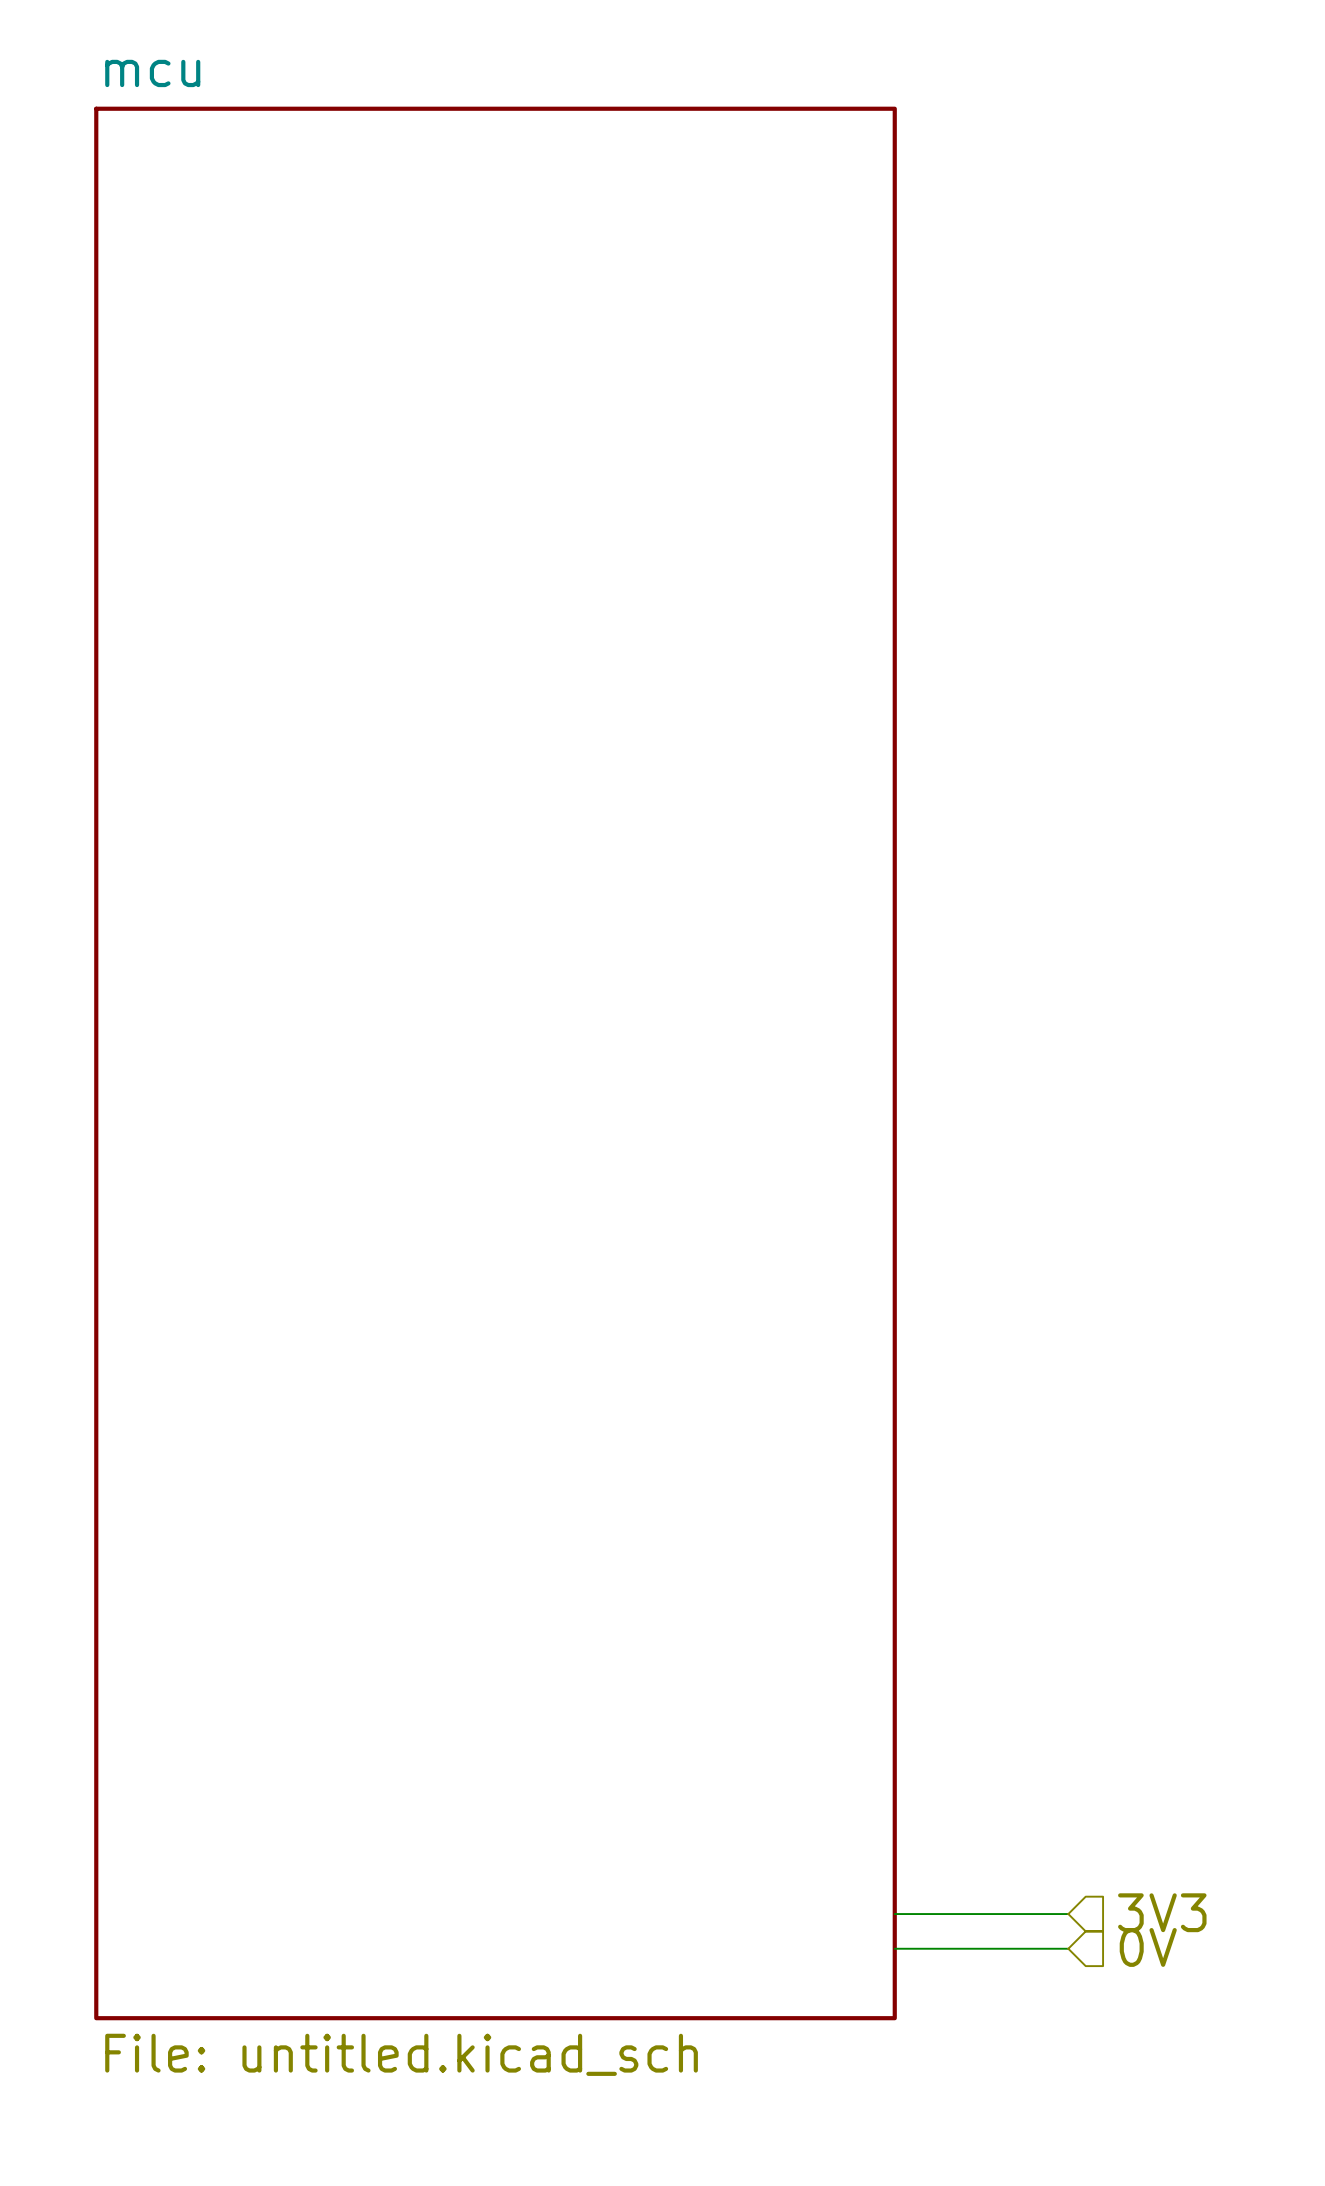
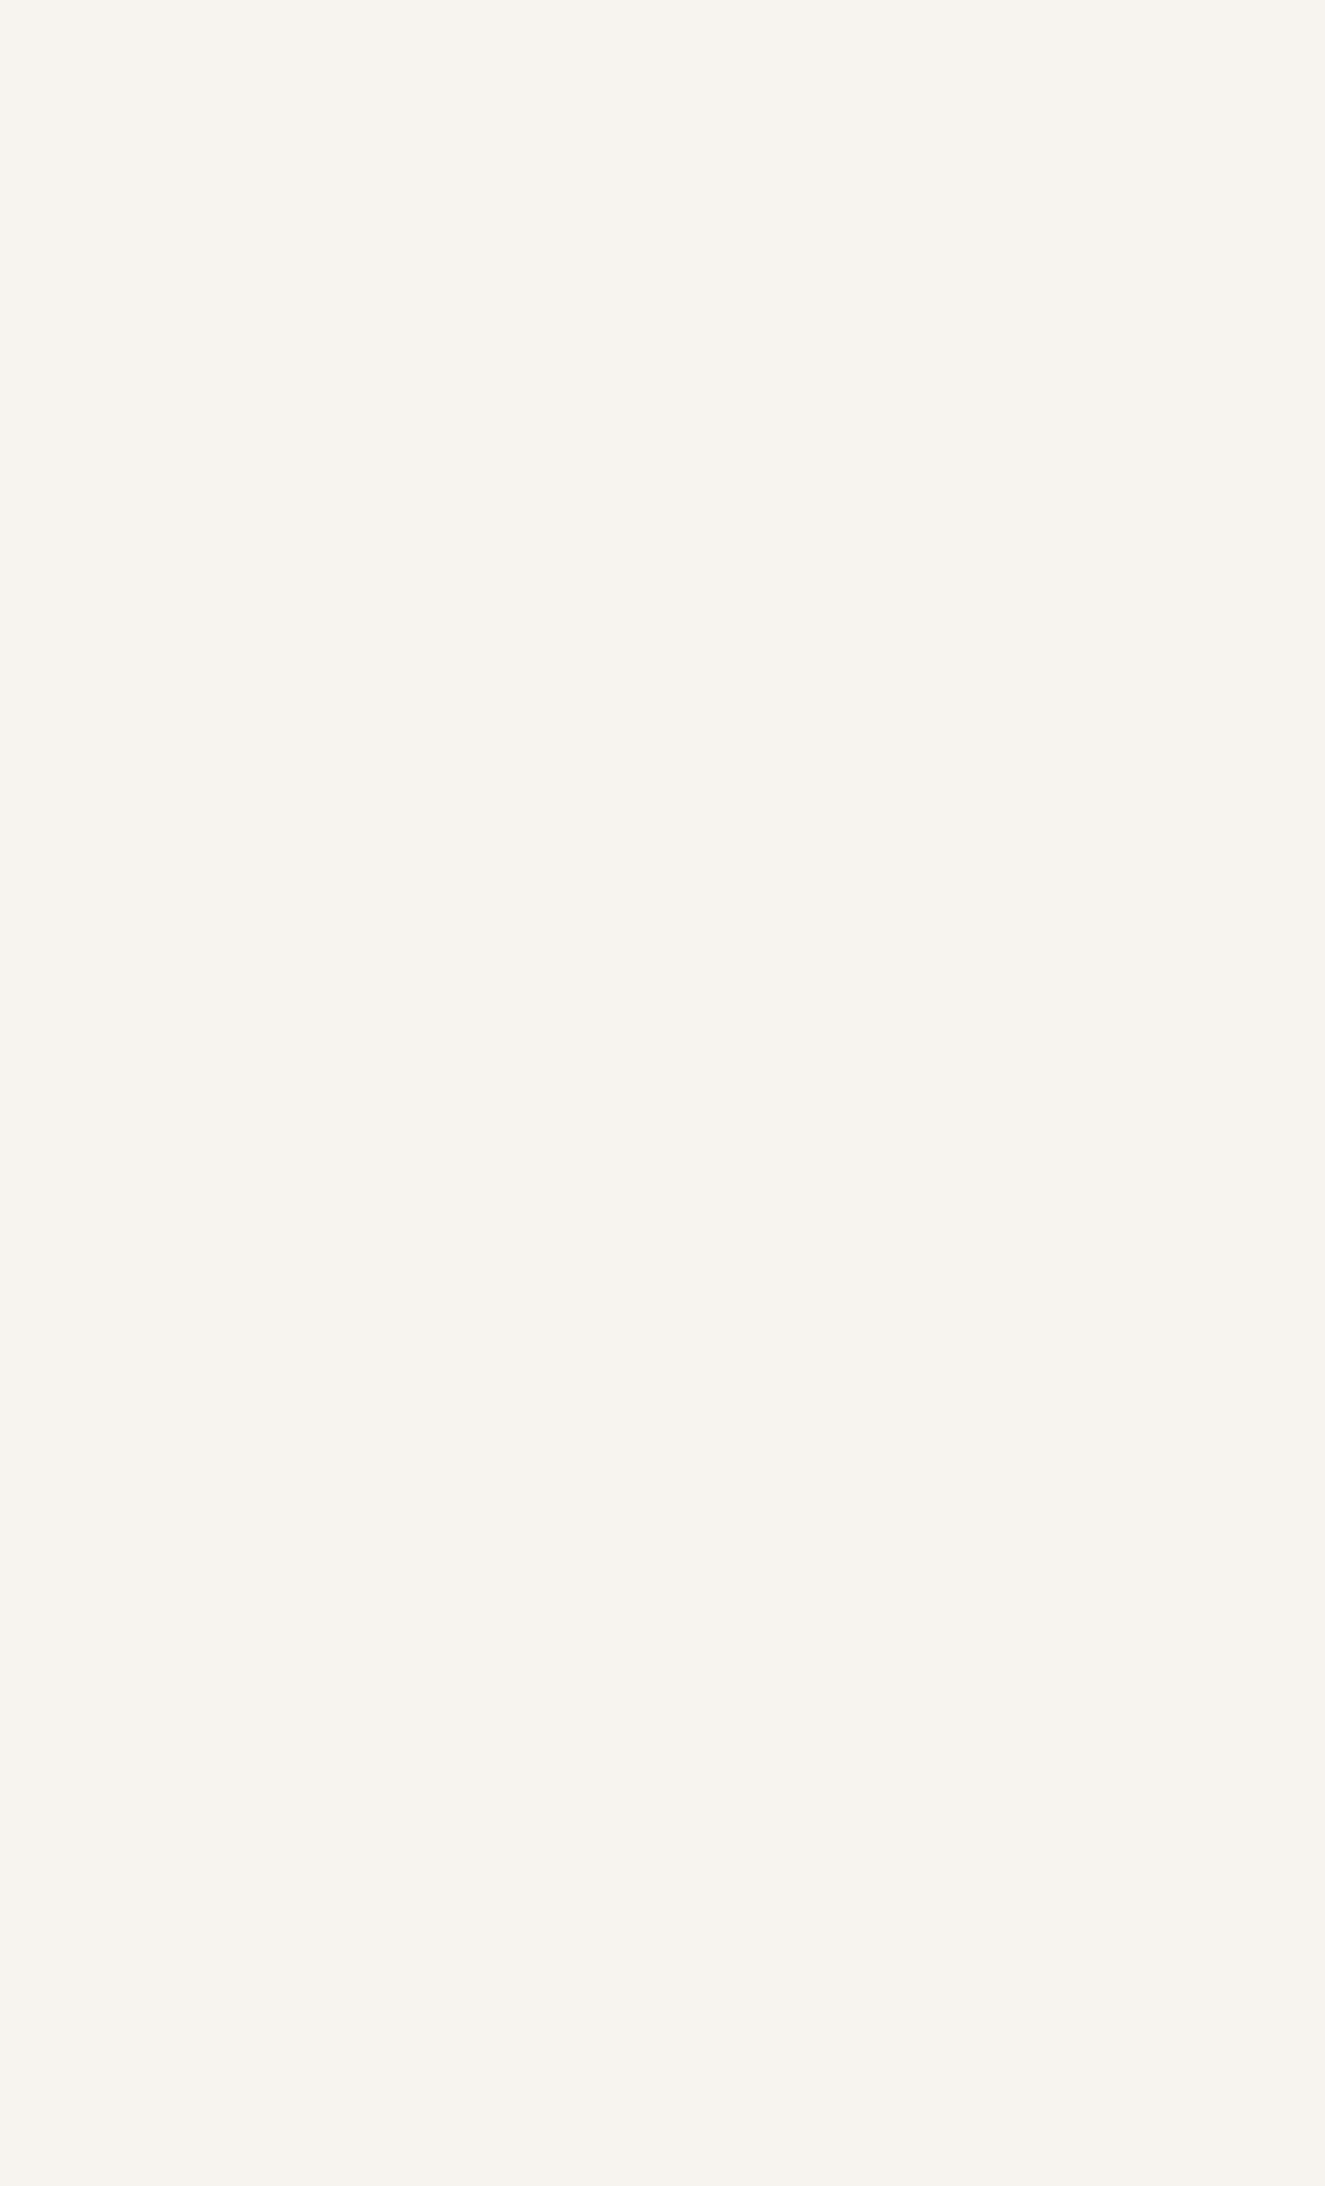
sheet mcu: File: untitled.kicad_sch (495, 1063) -> none
hierarchical label: 3V3 (1162, 1912) -> none
wire: (894, 1914) (1068, 1914) -> none
hierarchical label: 0V (1148, 1947) -> none
wire: (894, 1948) (1068, 1948) -> none

